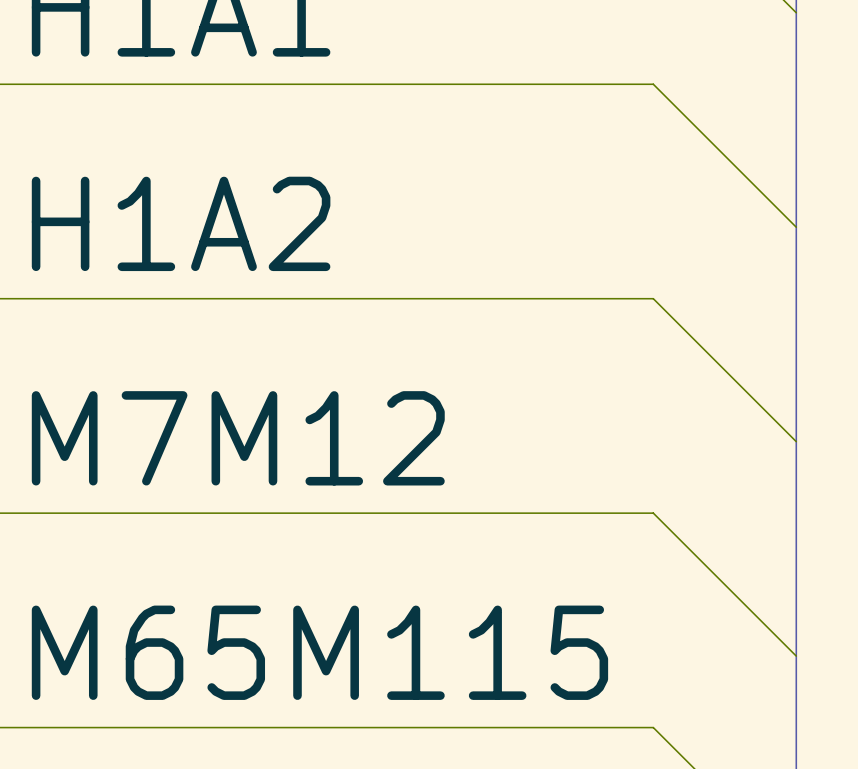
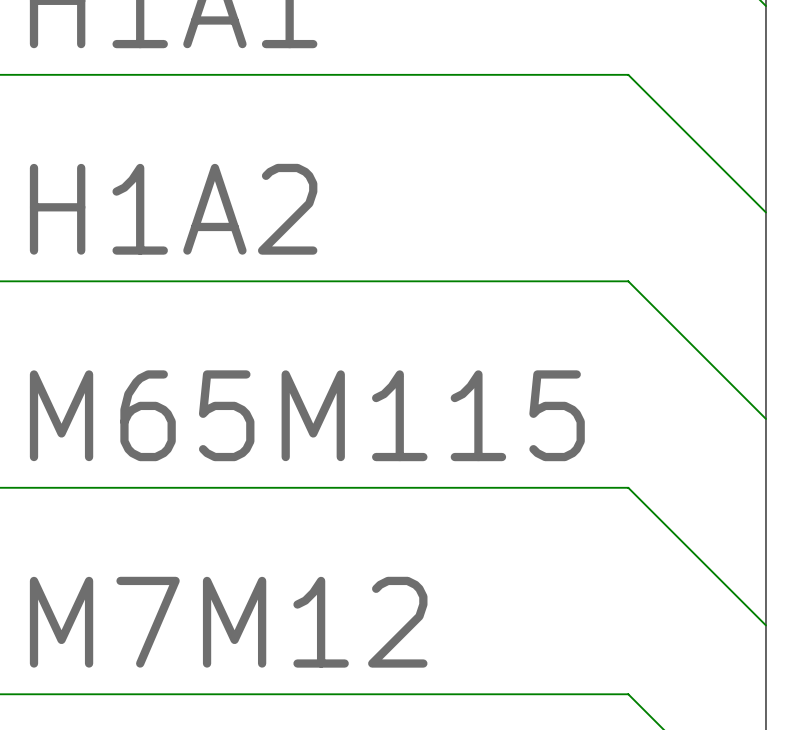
label: M7M12 (238, 438) -> M65M115 (307, 415)
label: M65M115 (319, 652) -> M7M12 (228, 622)

